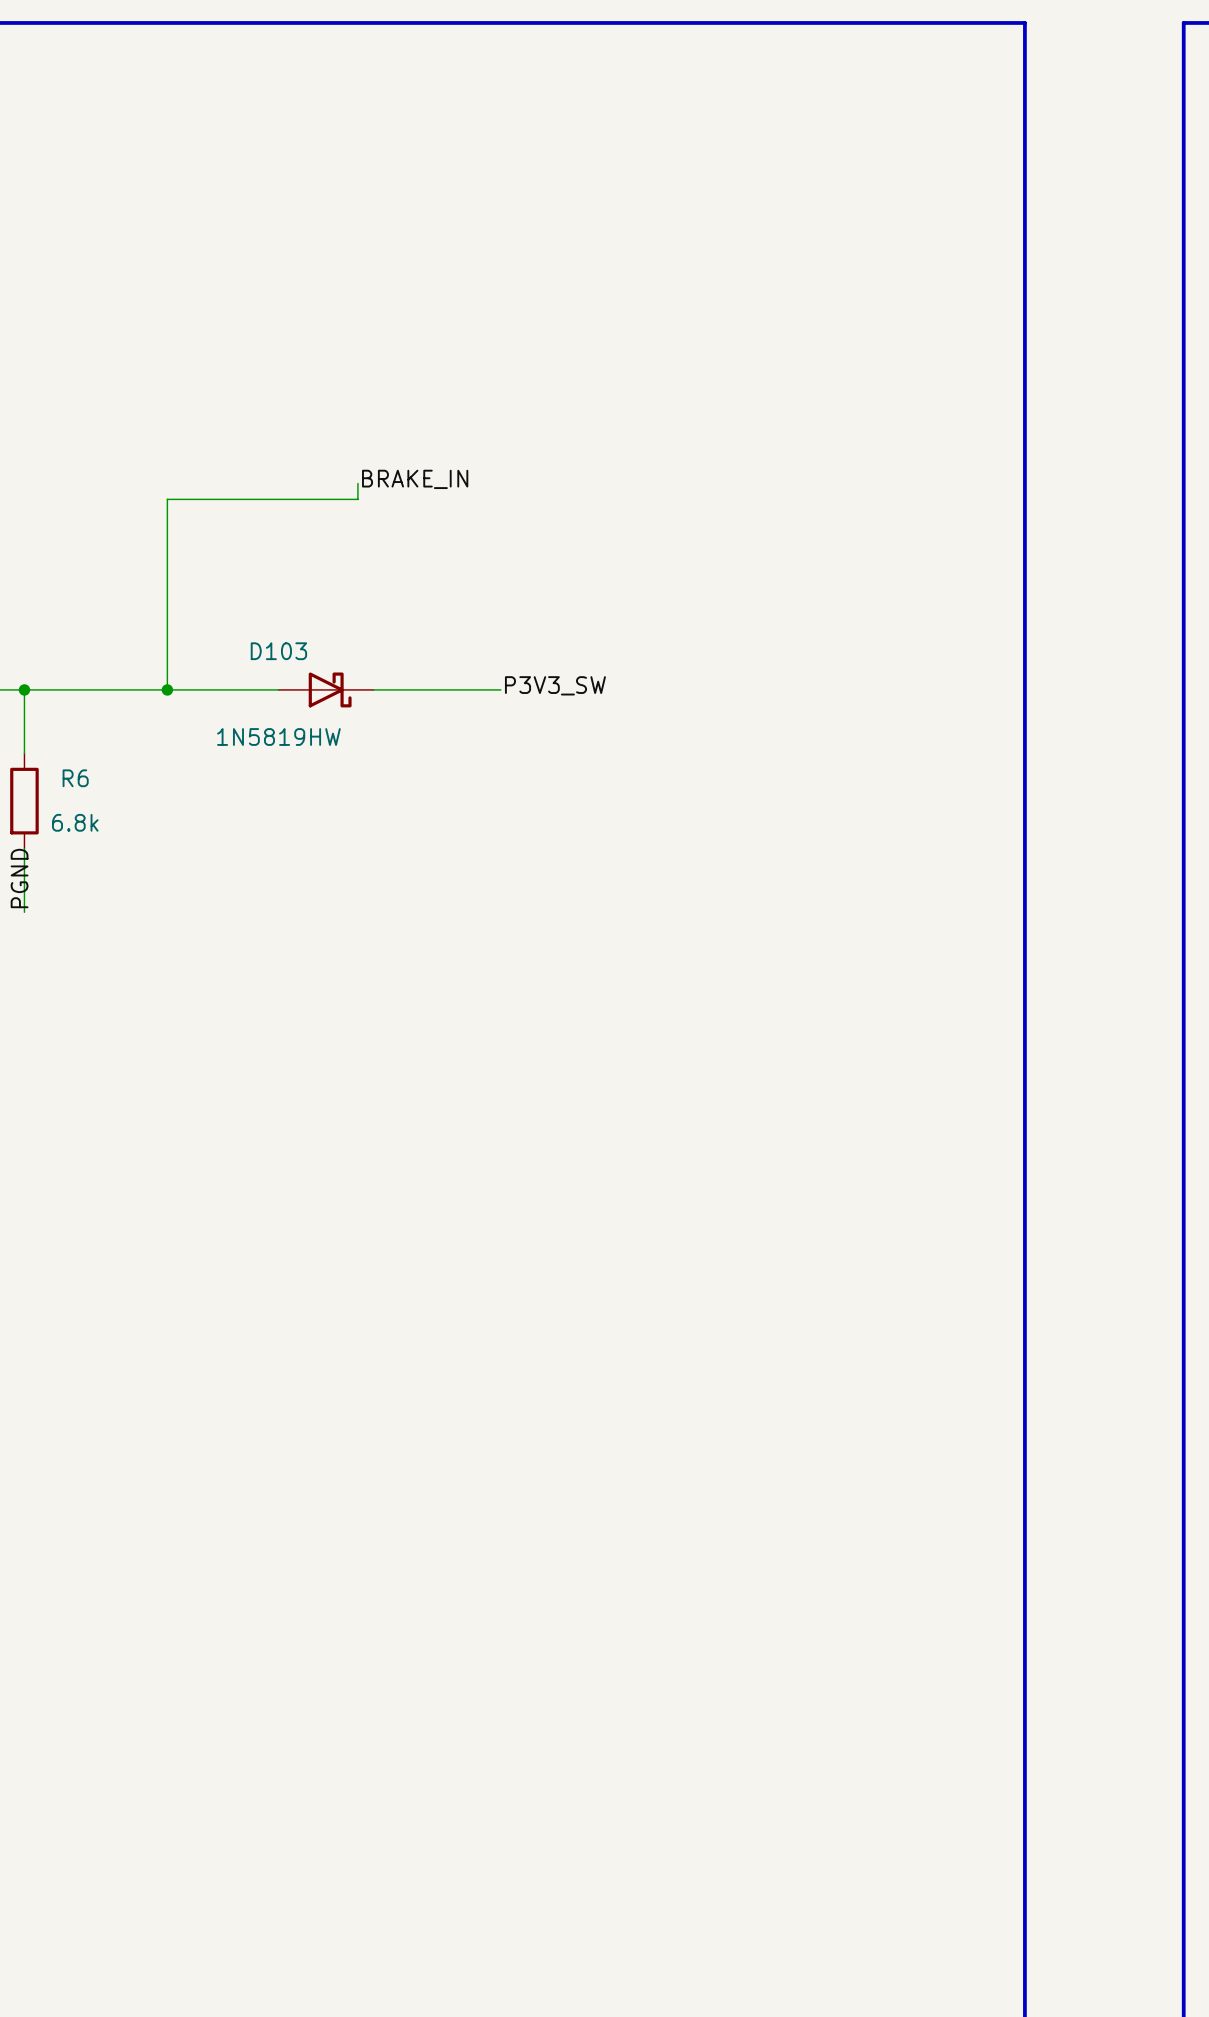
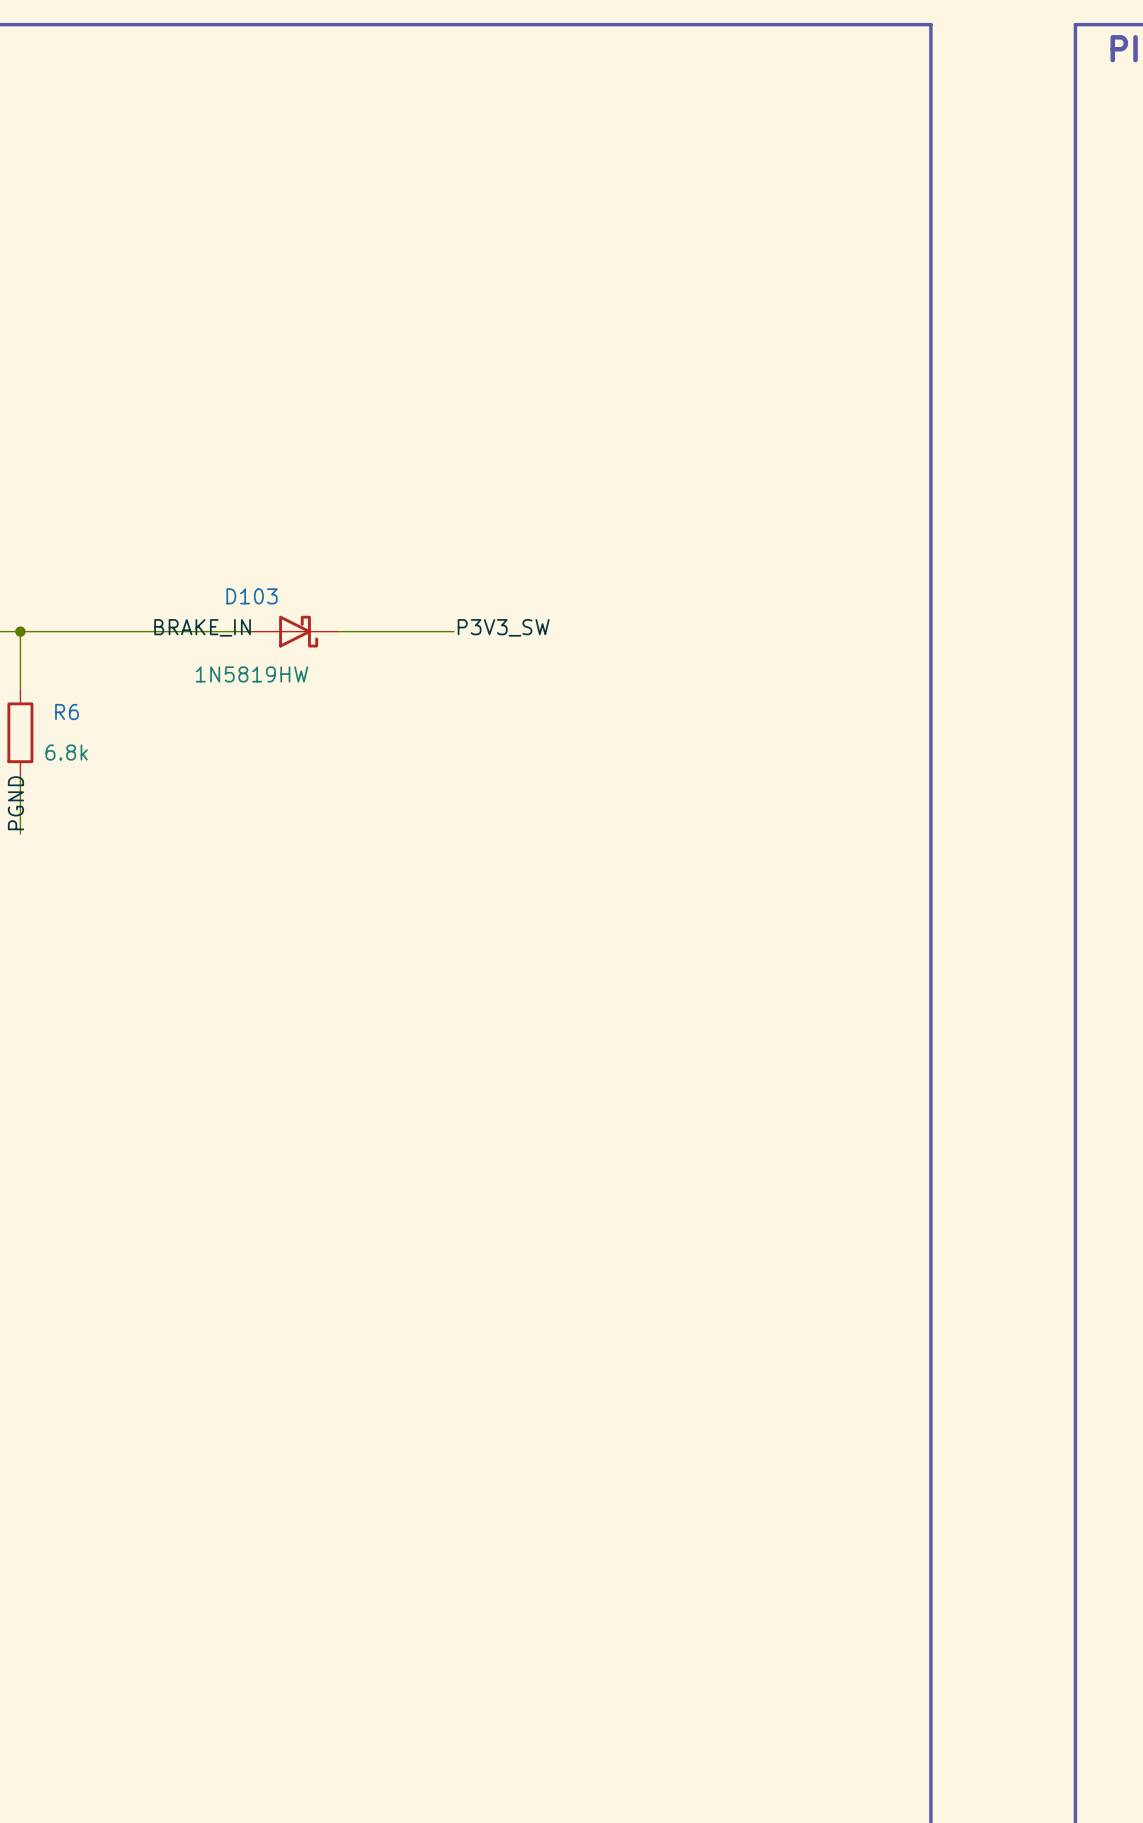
label position: BRAKE_IN (415, 479) -> BRAKE_IN (202, 627)
wire: (357, 483) (357, 499) (167, 499) (167, 689) -> none
junction: (167, 689) -> none

